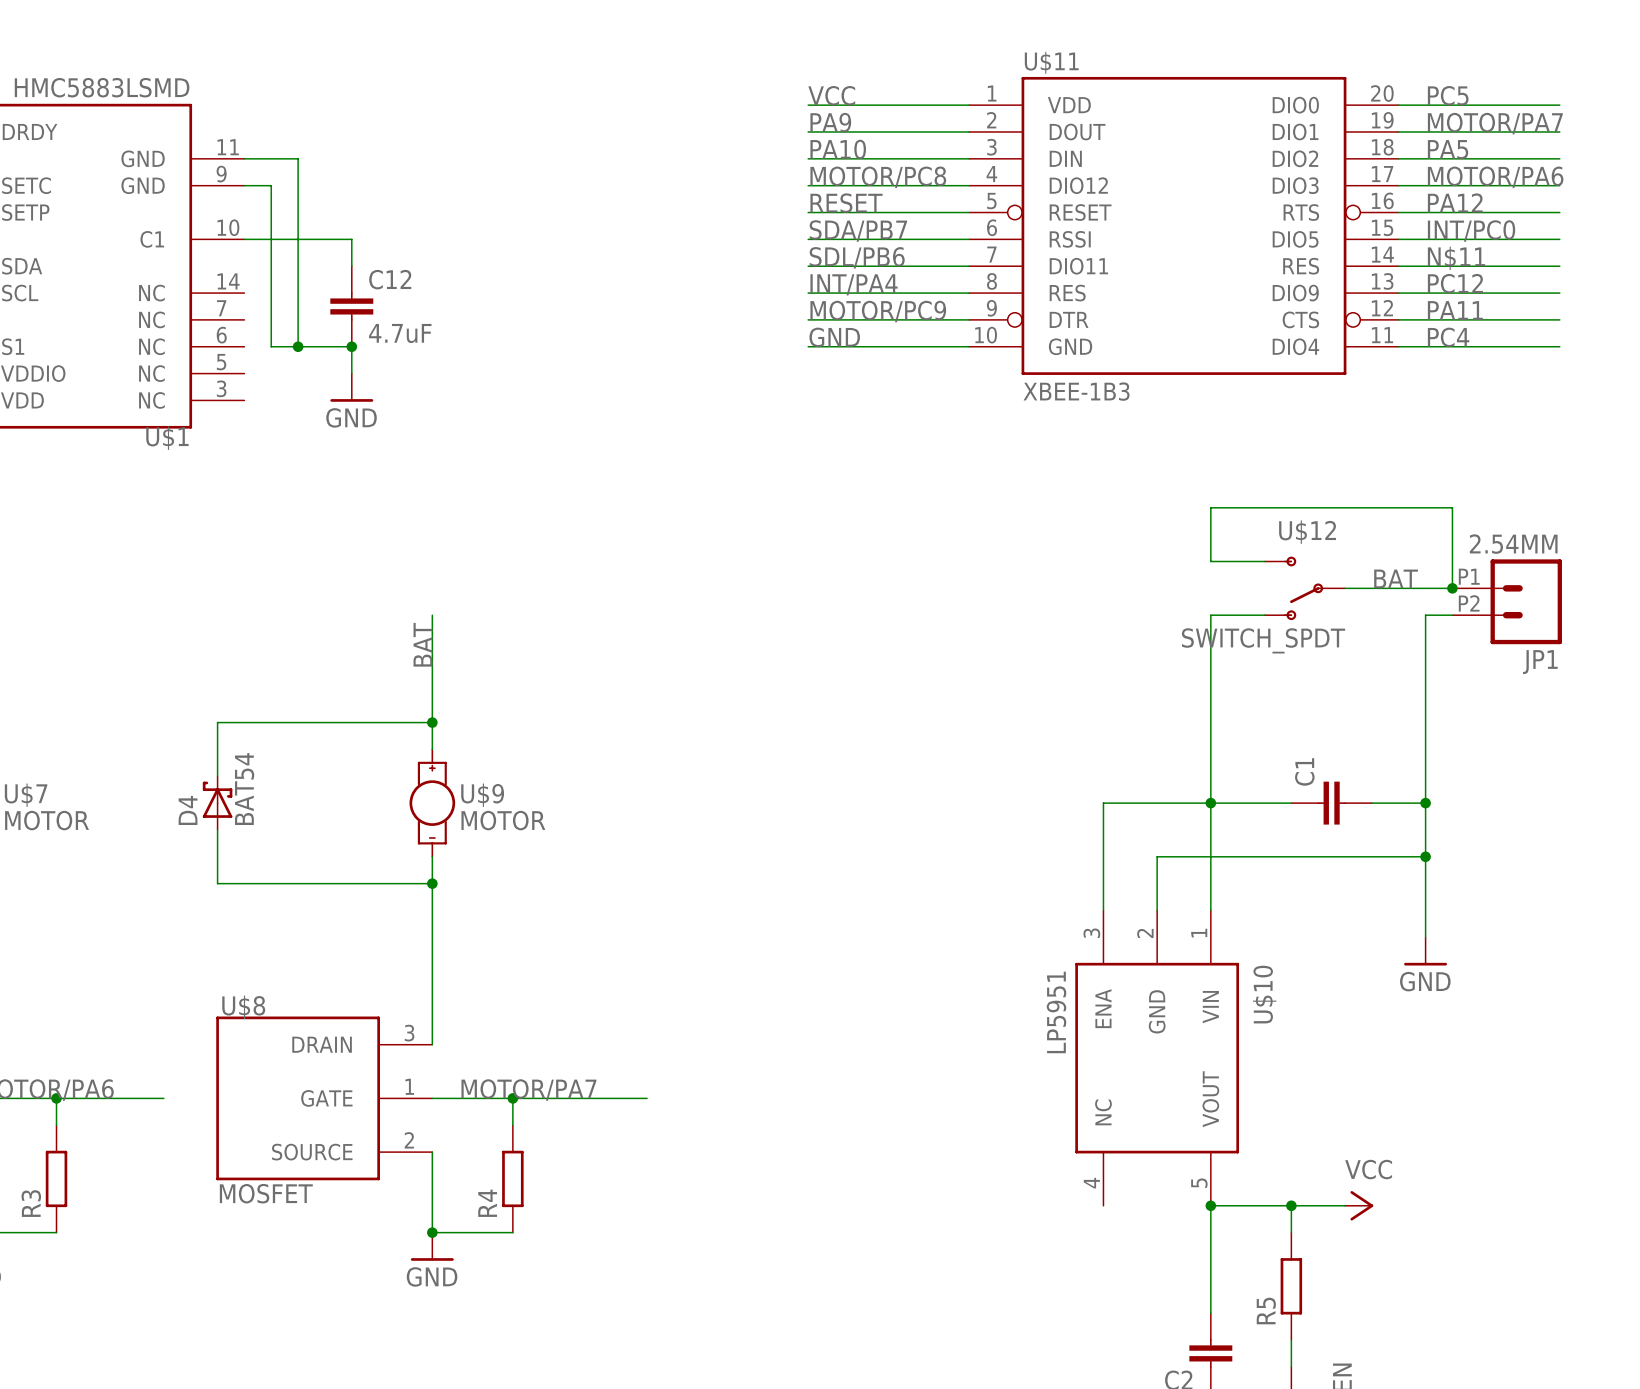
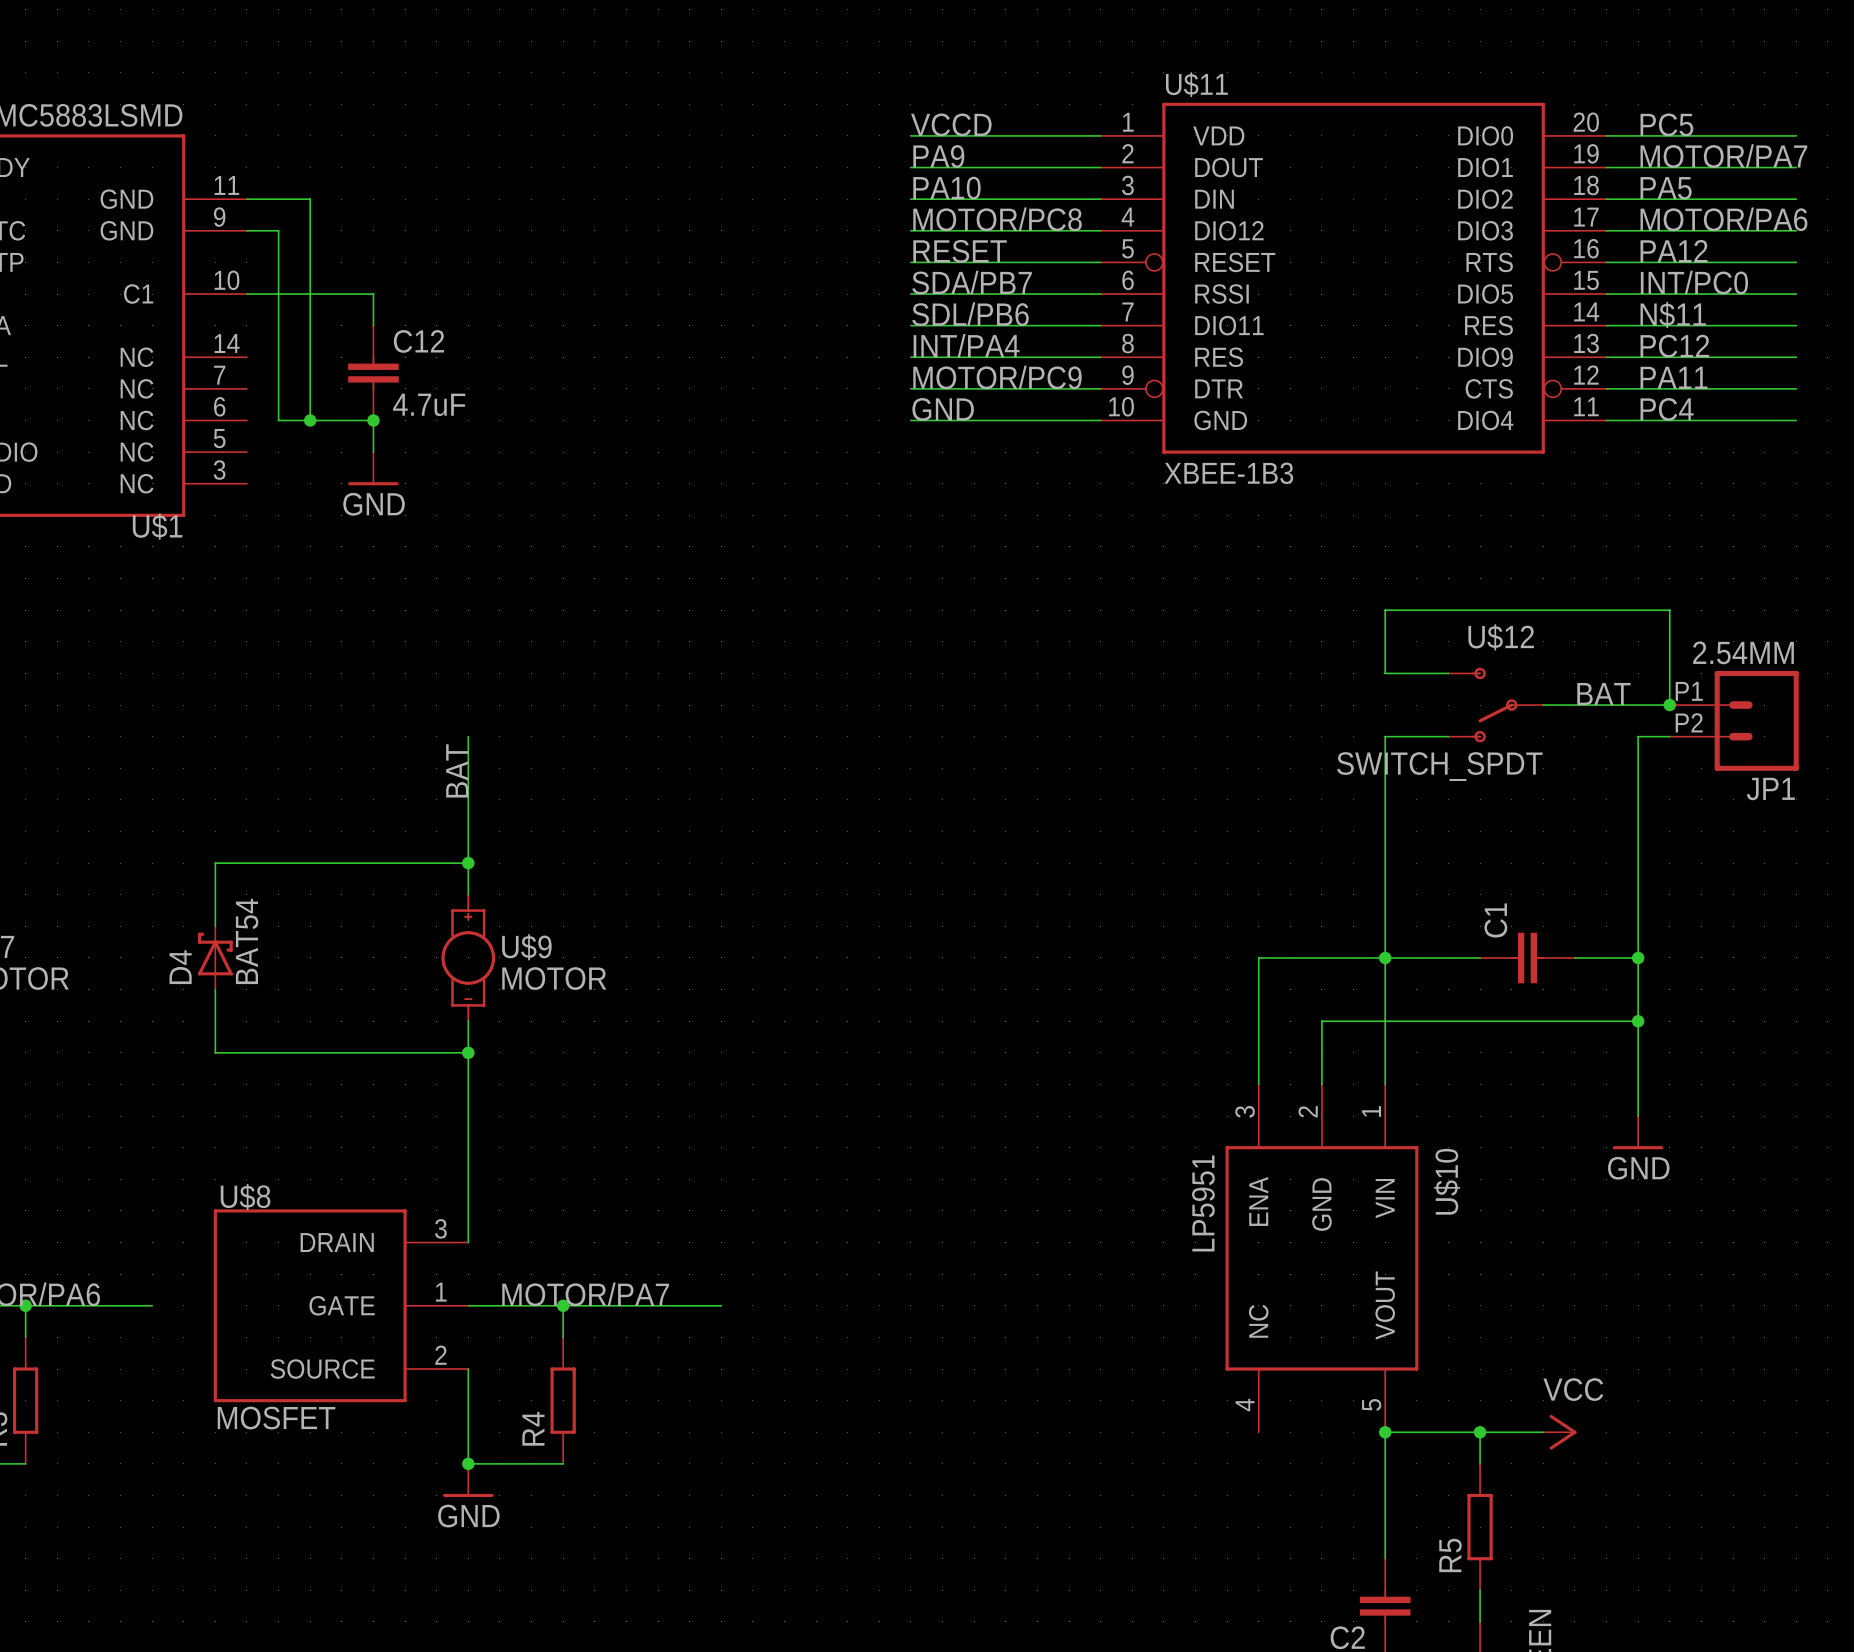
label: VCC (831, 95) -> VCCD (951, 124)

